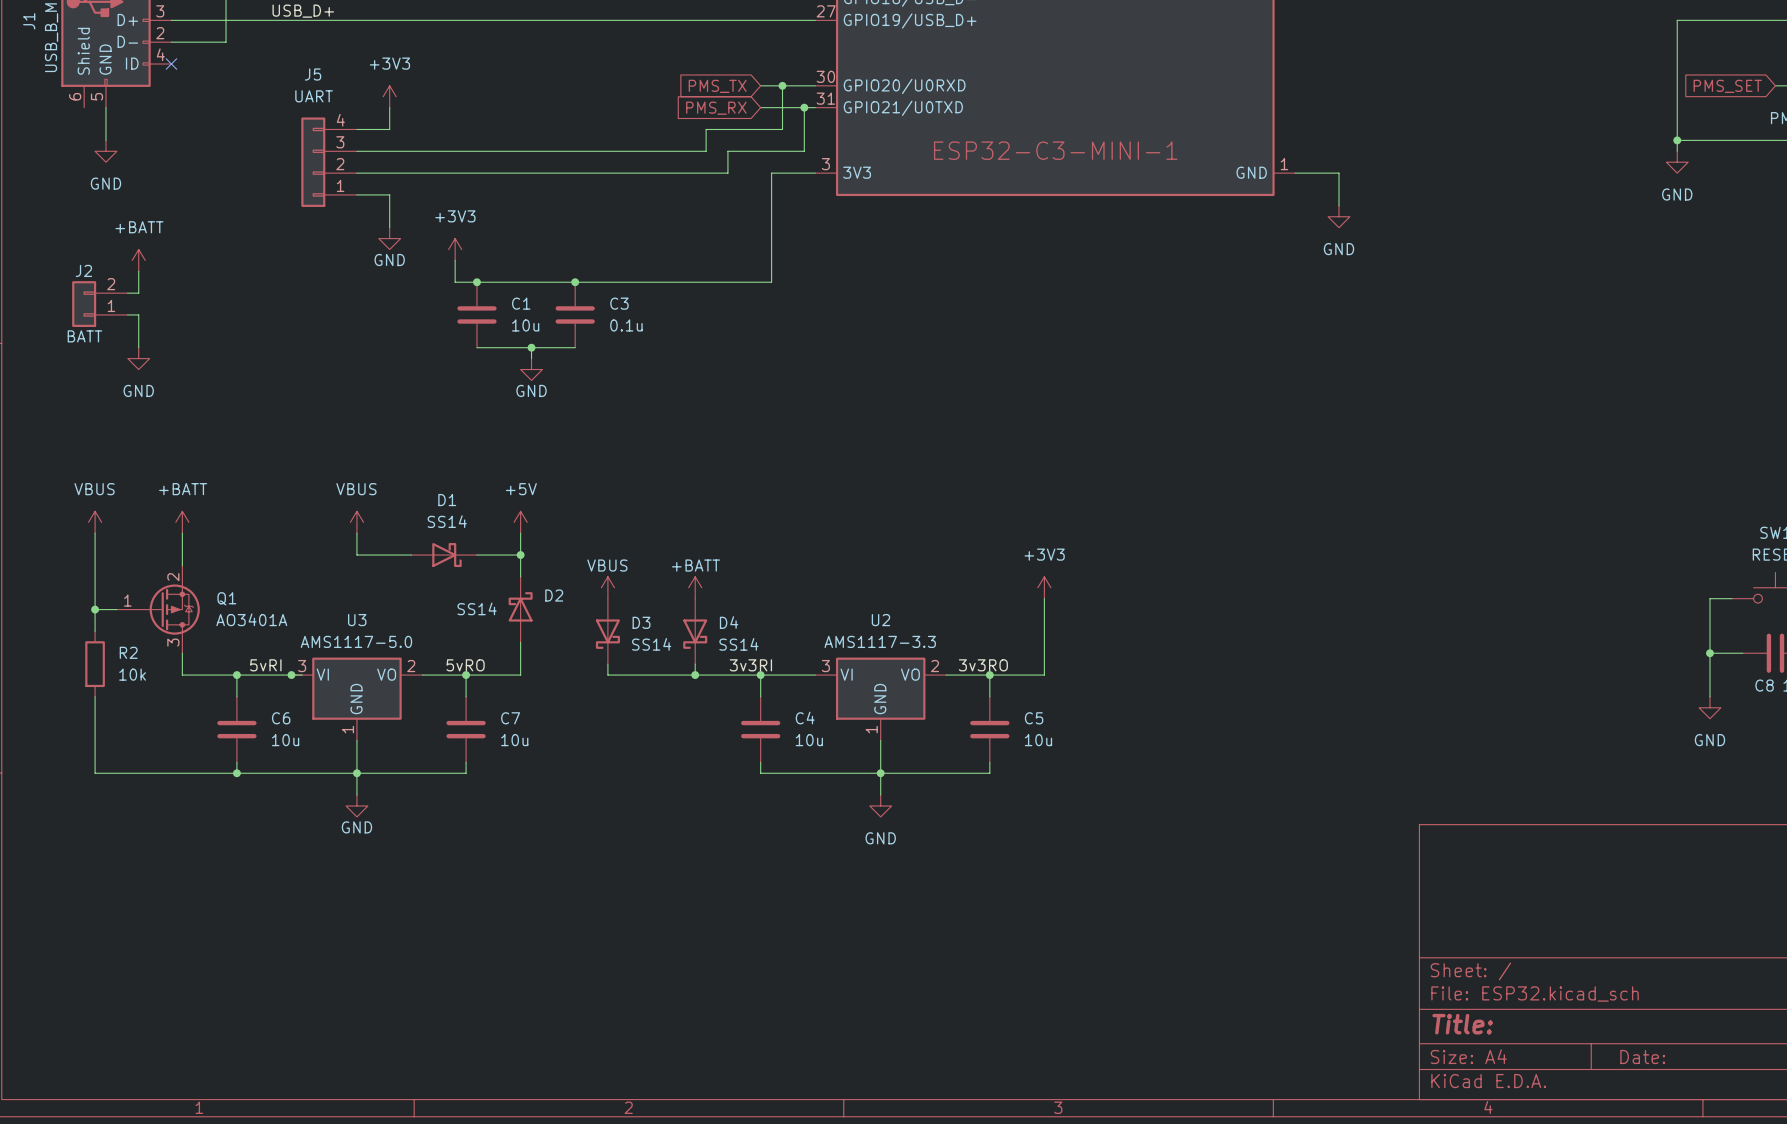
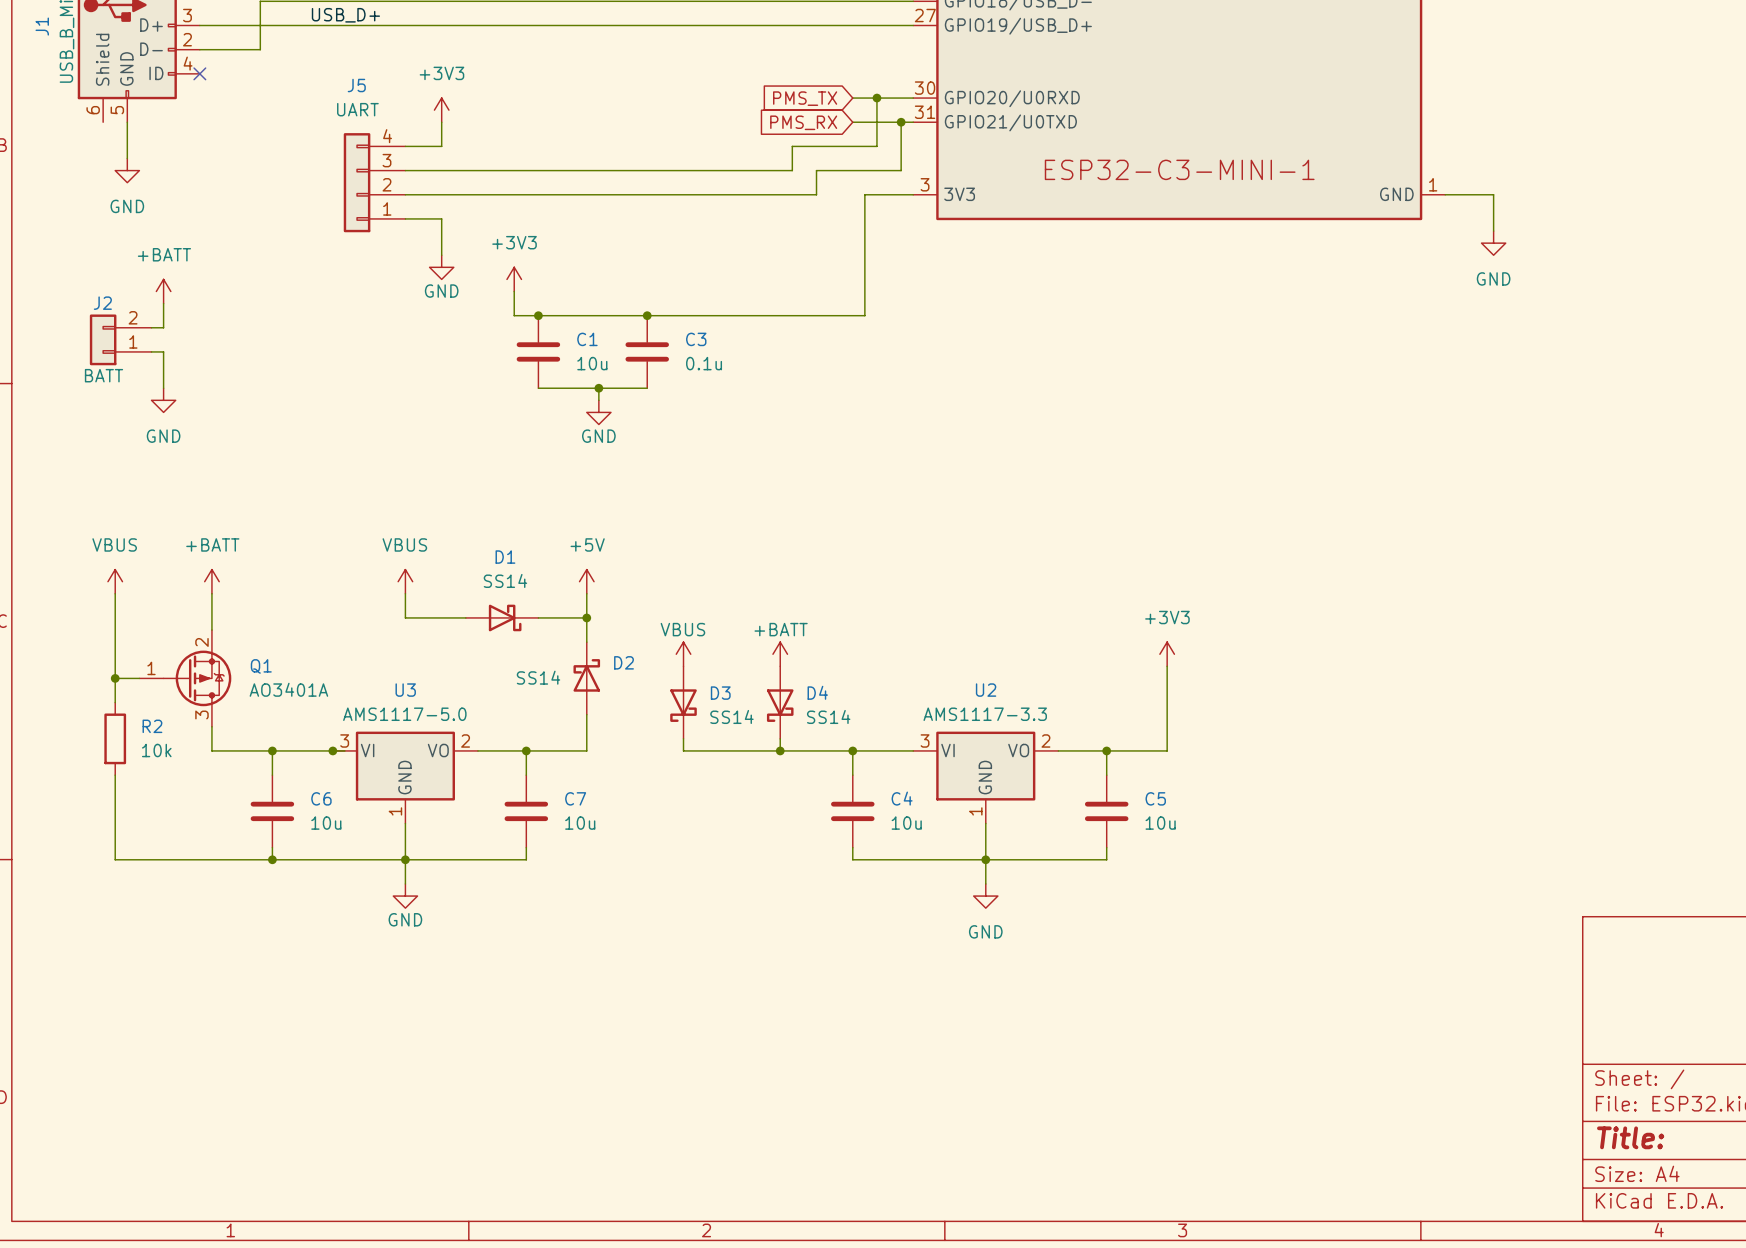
label: 5vRI (265, 665) -> none
label: 5vRO (465, 665) -> none
label: 3v3RI (750, 665) -> none
label: 3v3RO (983, 665) -> none

